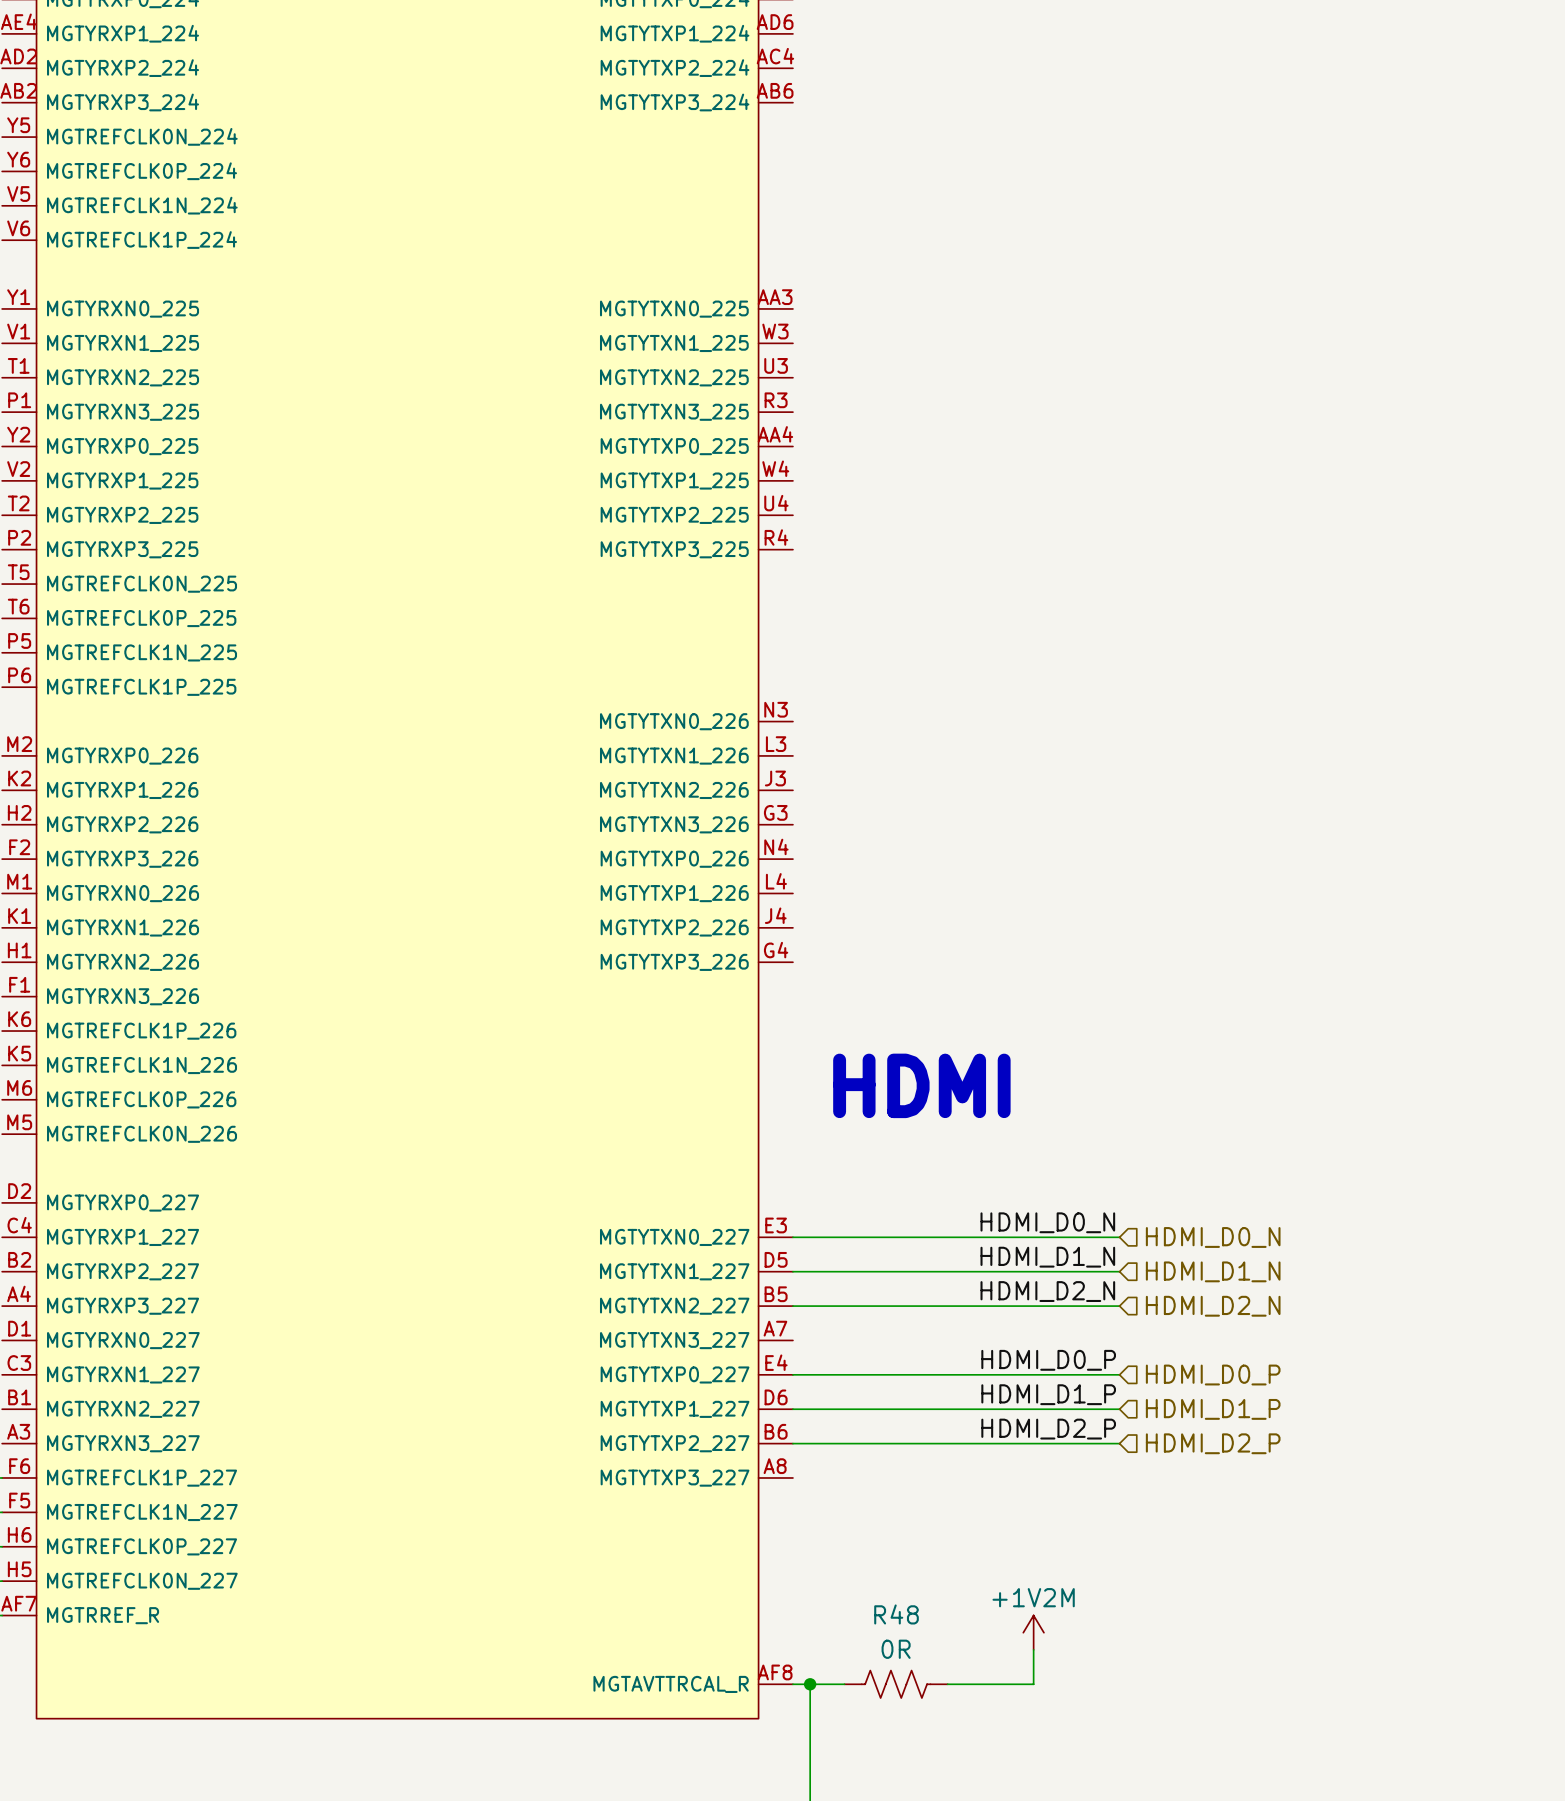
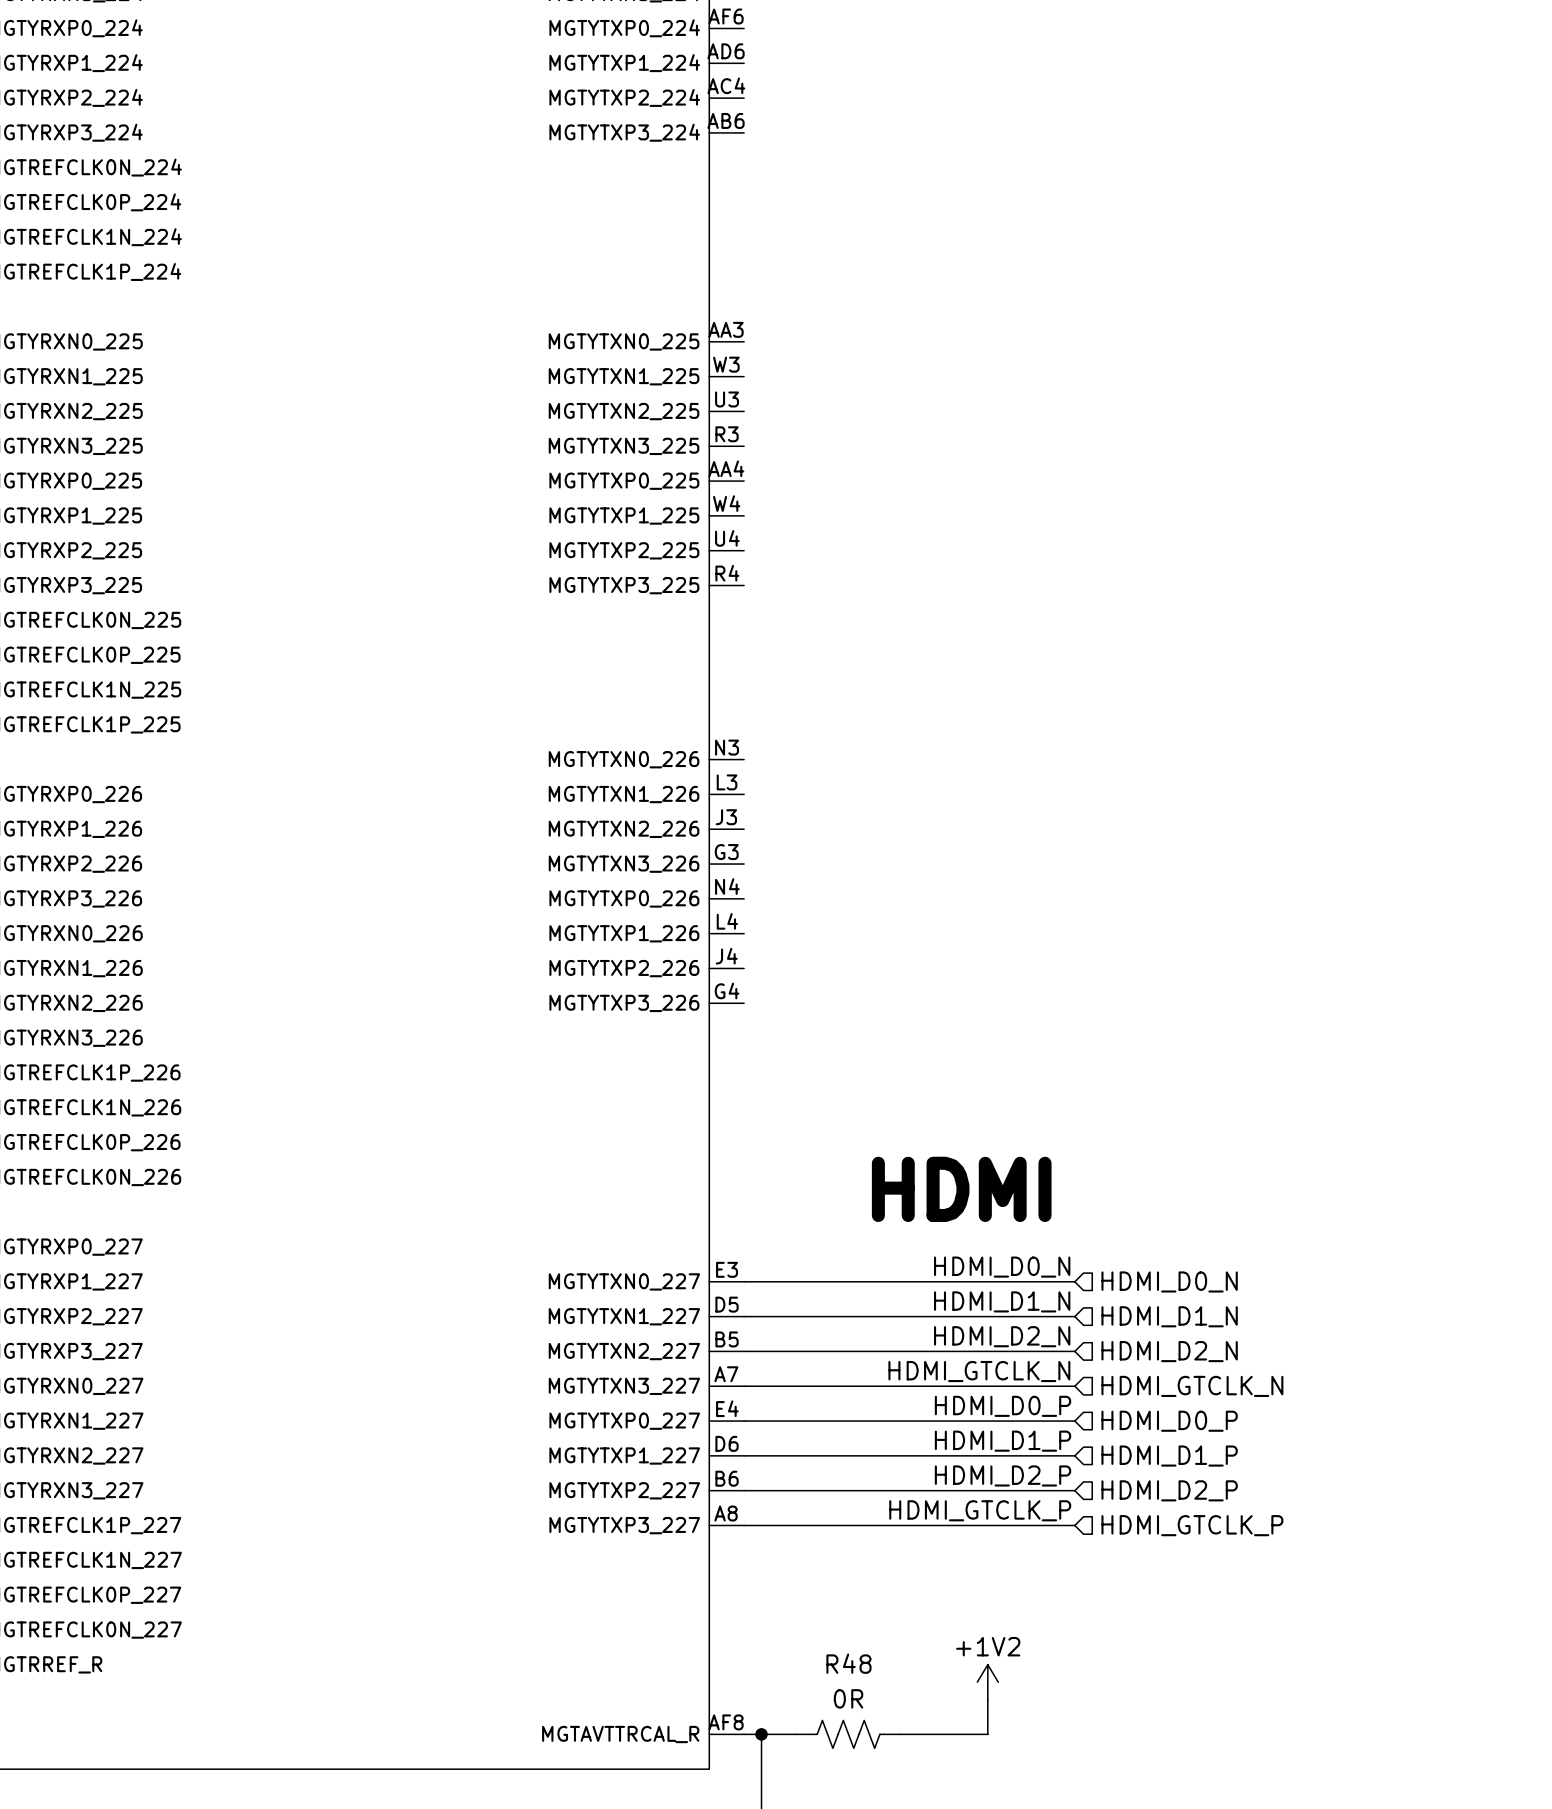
text position: HDMI (921, 1085) -> HDMI (961, 1189)
label: none -> HDMI_GTCLK_N (979, 1371)
wire: none -> (744, 1386) (1074, 1386)
hierarchical label: none -> HDMI_GTCLK_N (1192, 1386)
label: none -> HDMI_GTCLK_P (980, 1510)
wire: none -> (744, 1525) (1074, 1525)
hierarchical label: none -> HDMI_GTCLK_P (1192, 1525)
power symbol: +1V2M (1033, 1632) -> +1V2 (987, 1682)

